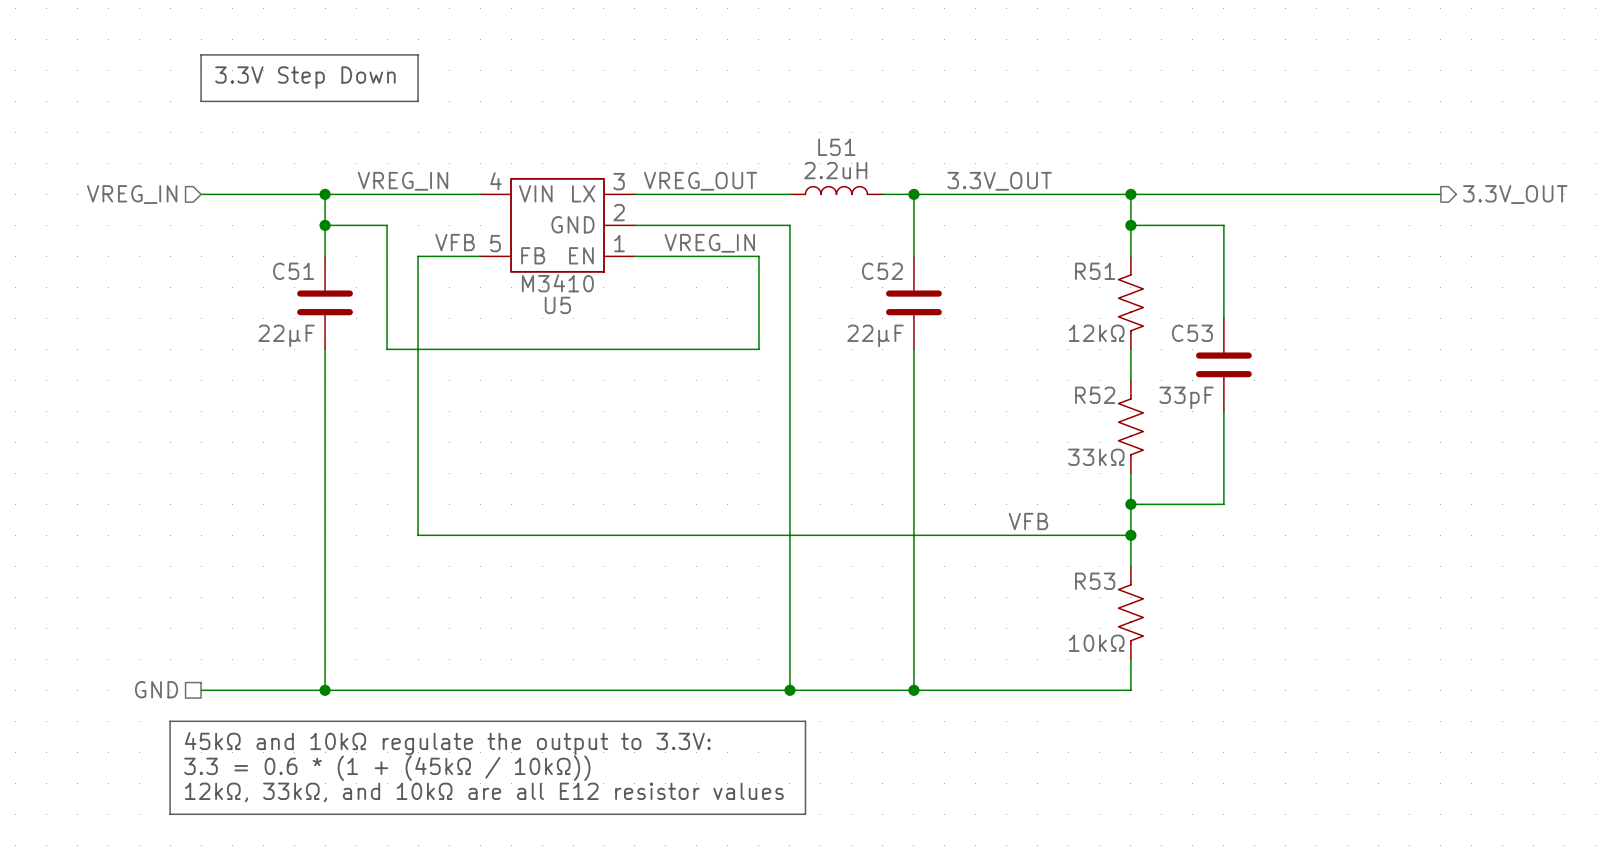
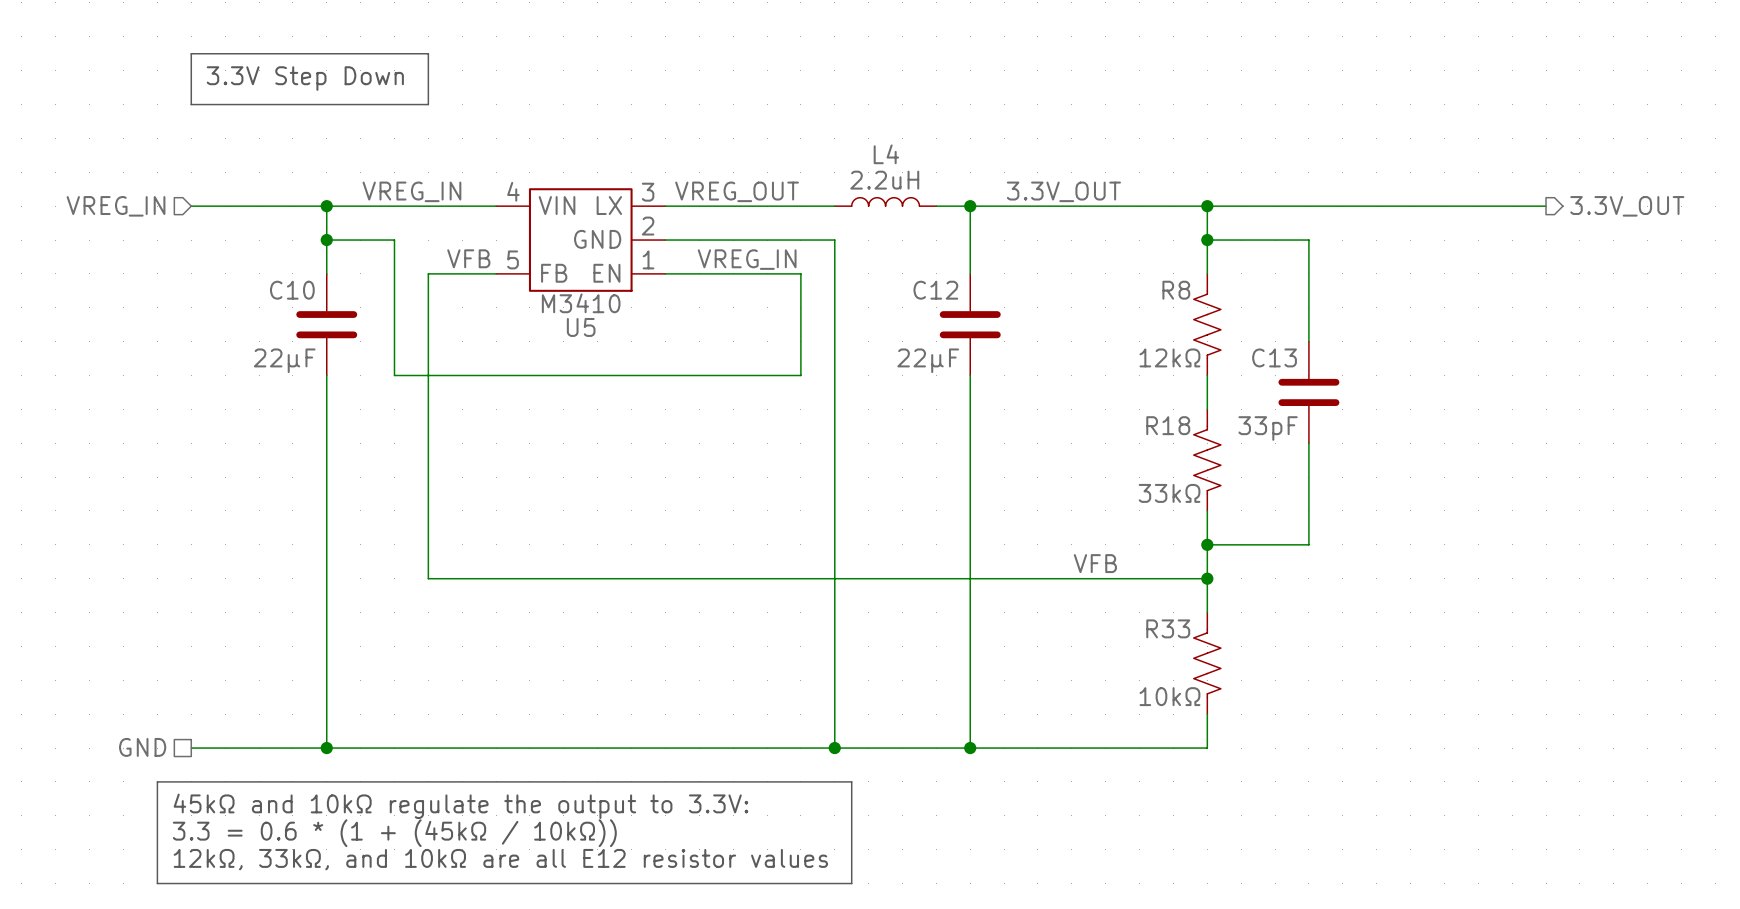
L51 name: L51 (836, 147) -> L4 (886, 154)
C51 name: C51 (293, 271) -> C10 (292, 290)
C52 name: C52 (882, 271) -> C12 (935, 290)
R51 name: R51 (1095, 271) -> R8 (1176, 290)
C53 name: C53 (1192, 333) -> C13 (1274, 357)
R52 name: R52 (1095, 395) -> R18 (1168, 425)
R53 name: R53 (1095, 581) -> R33 (1168, 628)

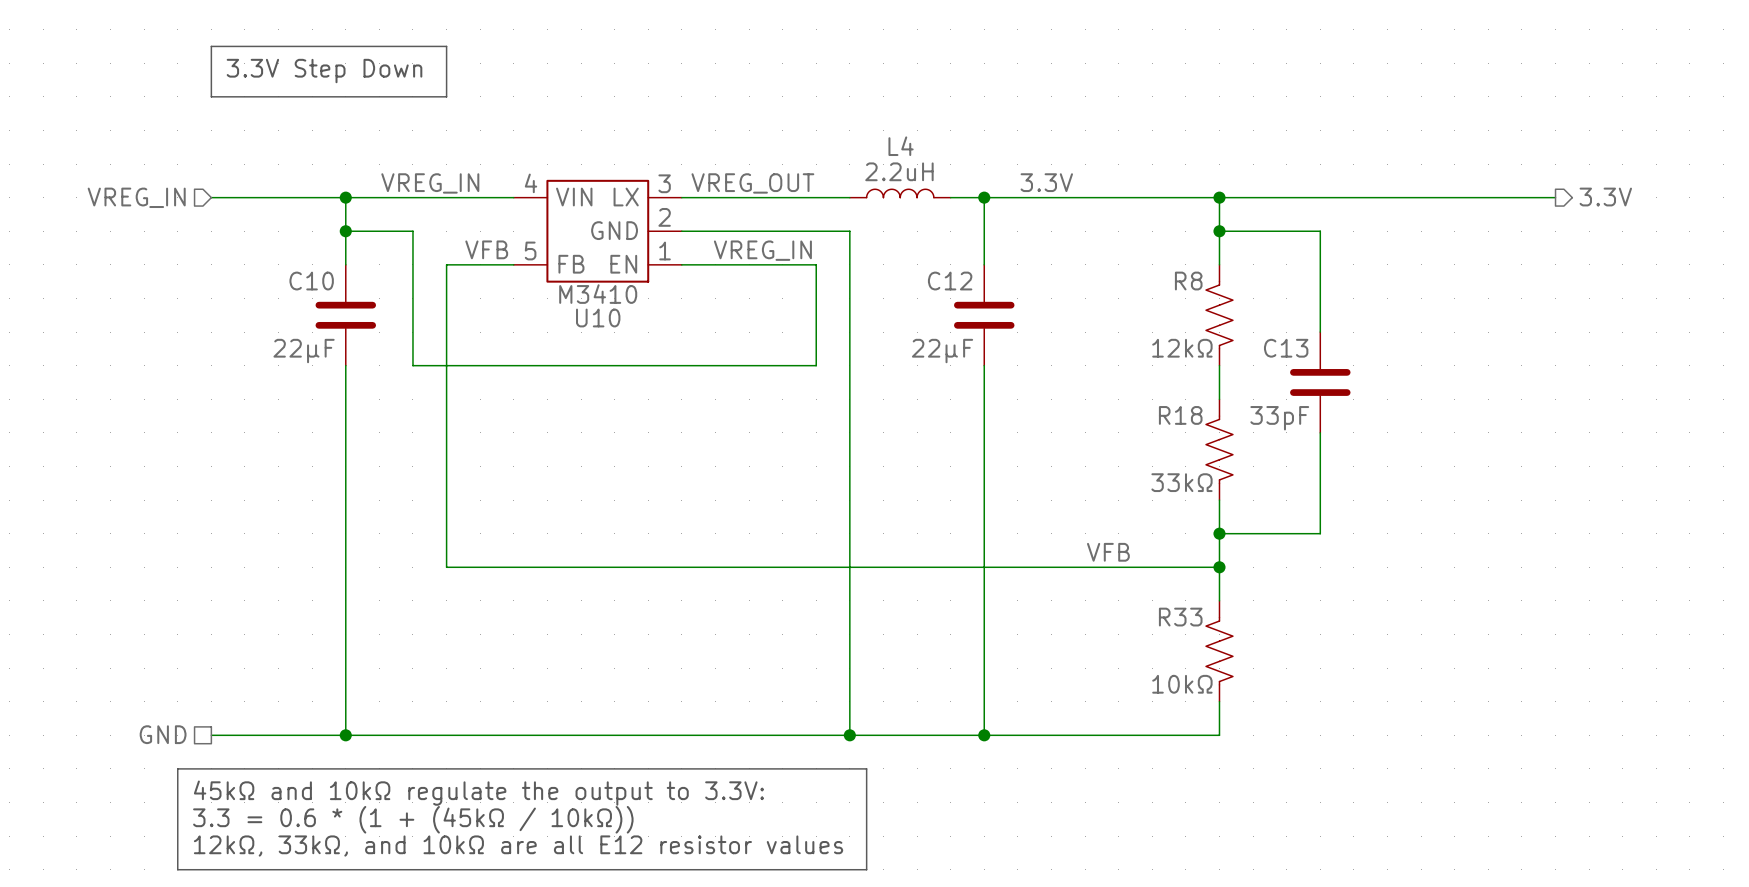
label: 3.3V_OUT (1063, 191) -> 3.3V (1046, 182)
hierarchical label: 3.3V_OUT (1627, 206) -> 3.3V (1605, 197)
U5 name: U5 (581, 327) -> U10 (598, 317)

